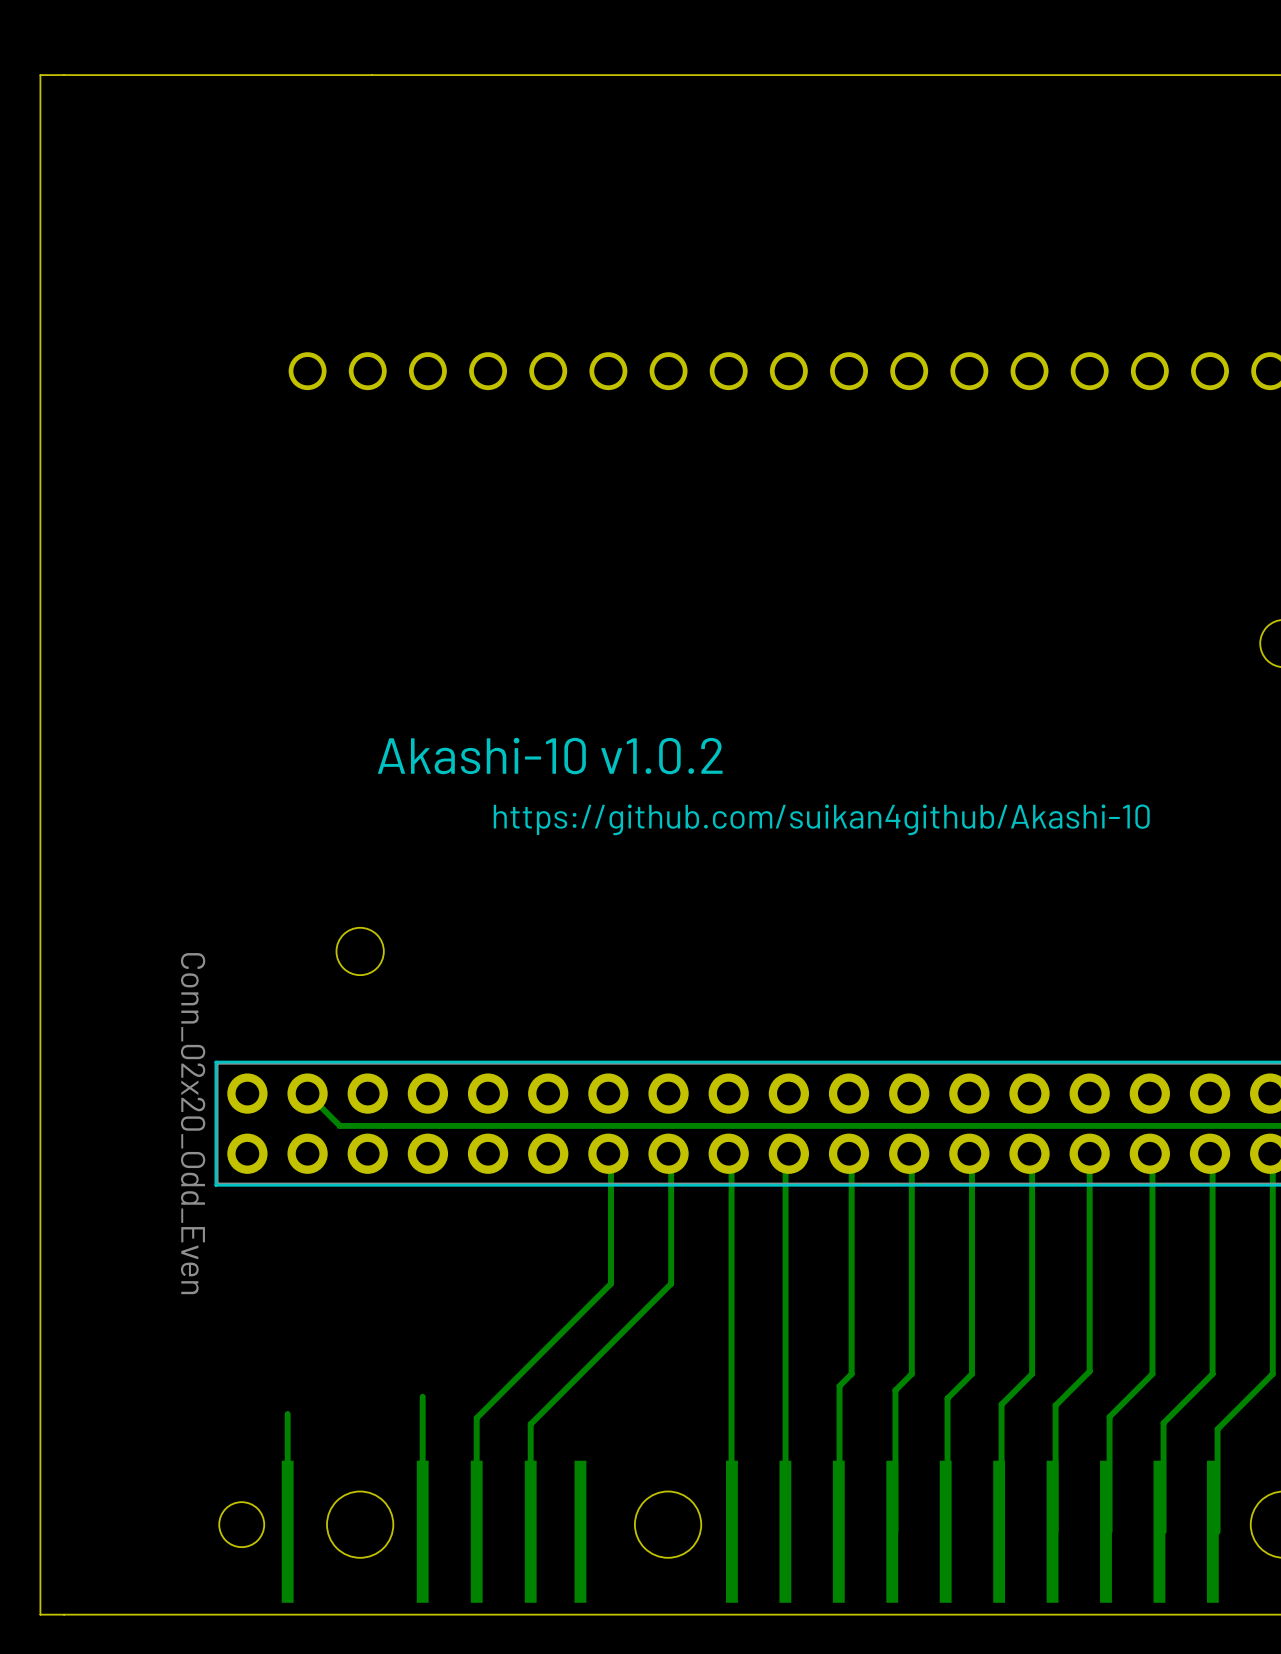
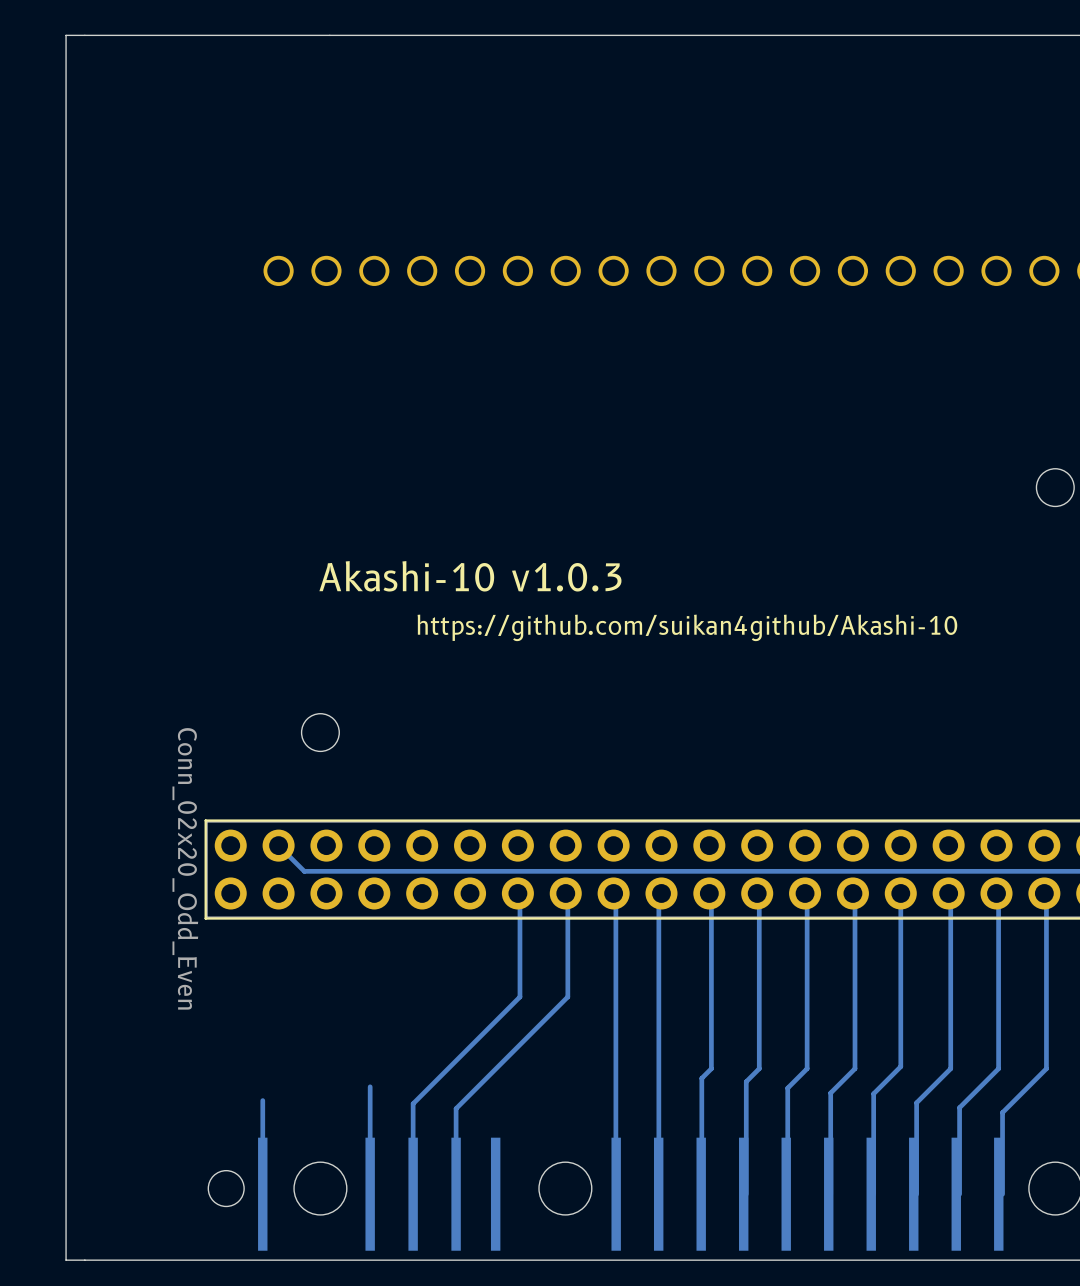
text: Akashi-10 v1.0.2 (550, 756) -> Akashi-10 v1.0.3 (470, 576)

